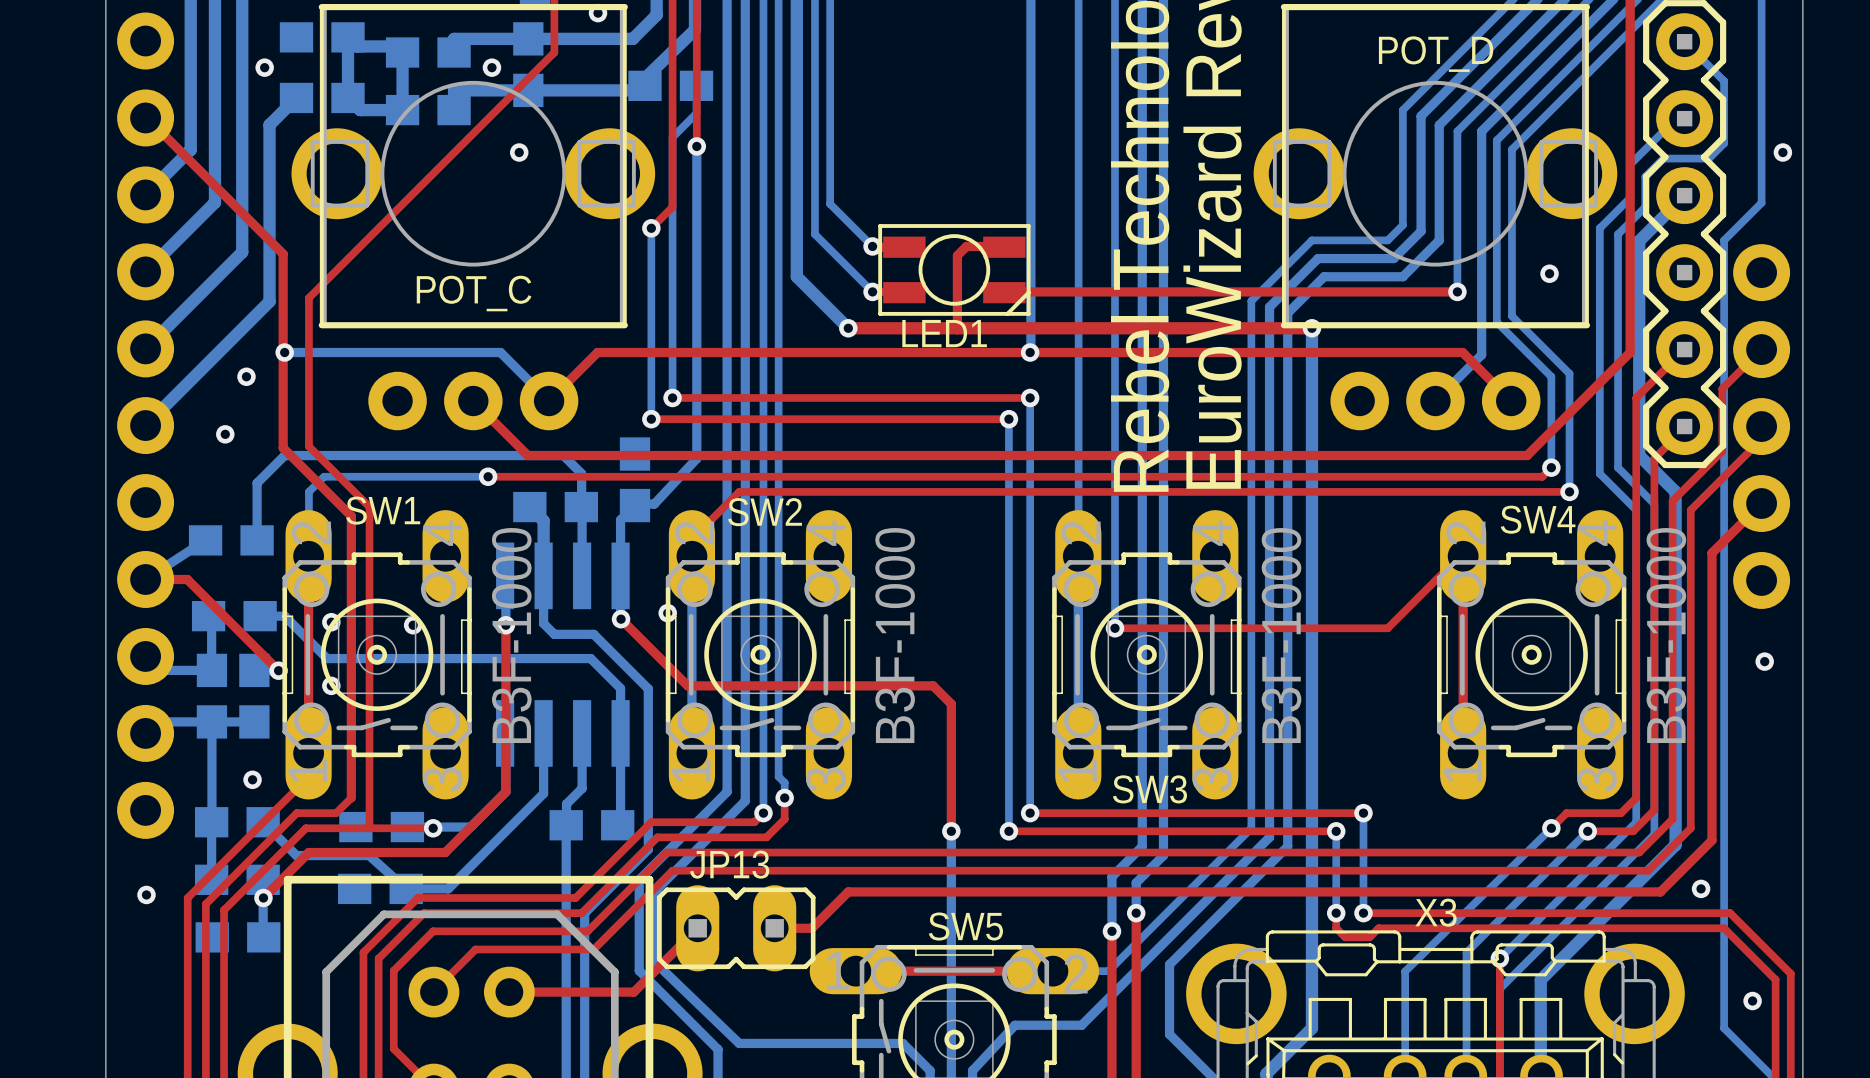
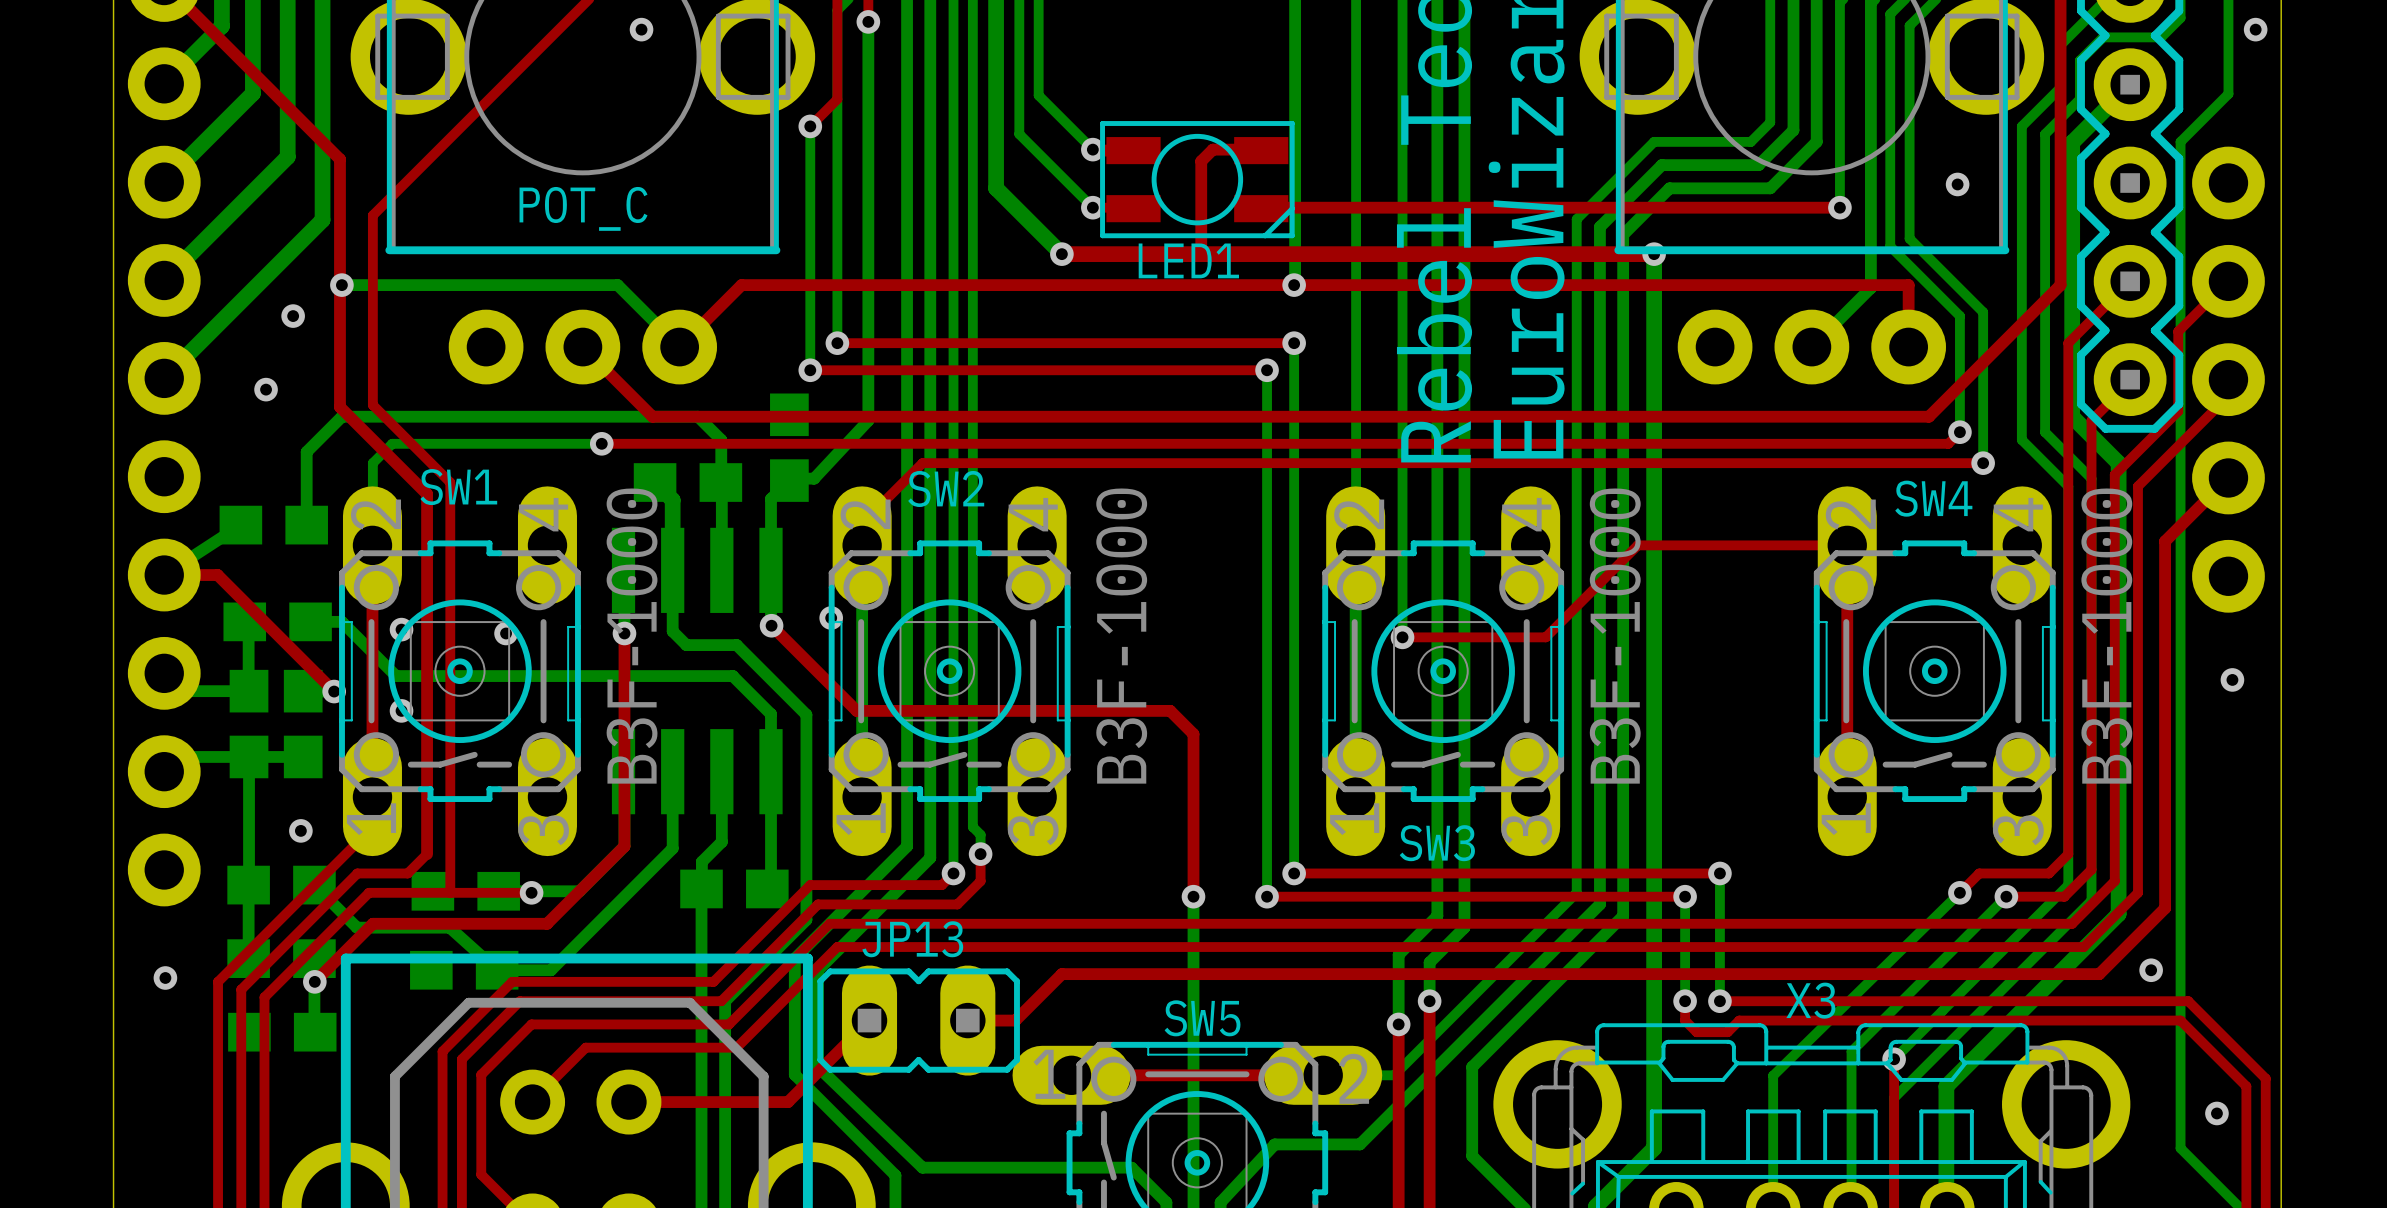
top track: (1462, 352) (1511, 401) -> (1846, 285) (1908, 285) (1908, 347)
top track: (1459, 556) (1387, 628) (1227, 628) -> (1842, 545) (1637, 545) (1545, 637)

